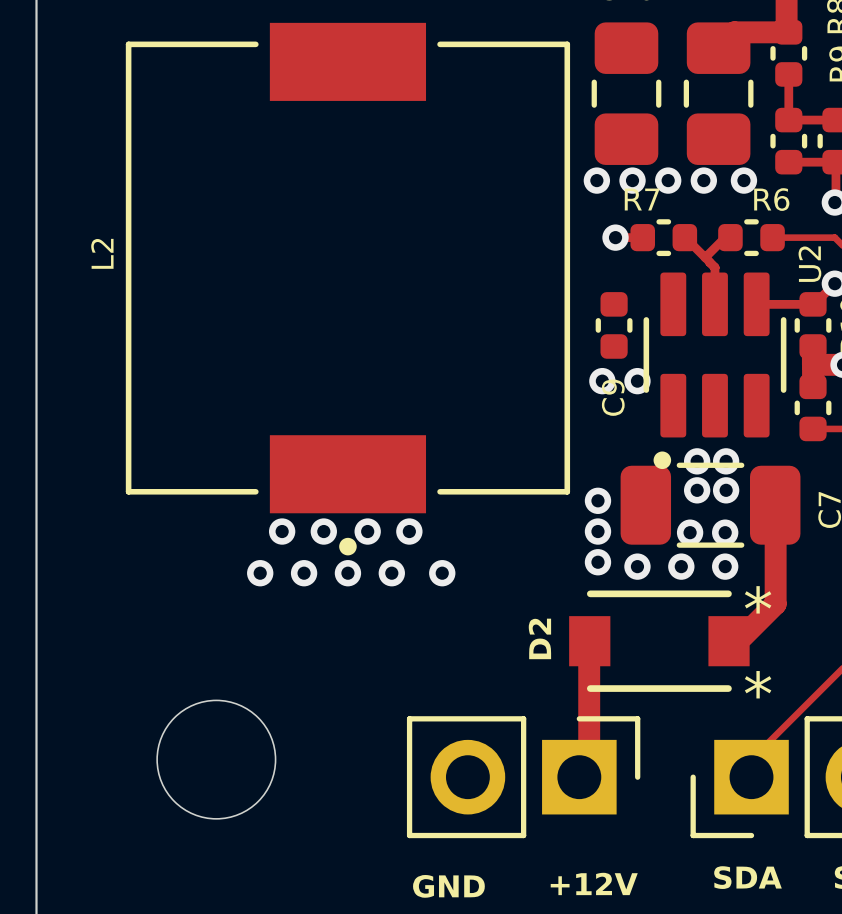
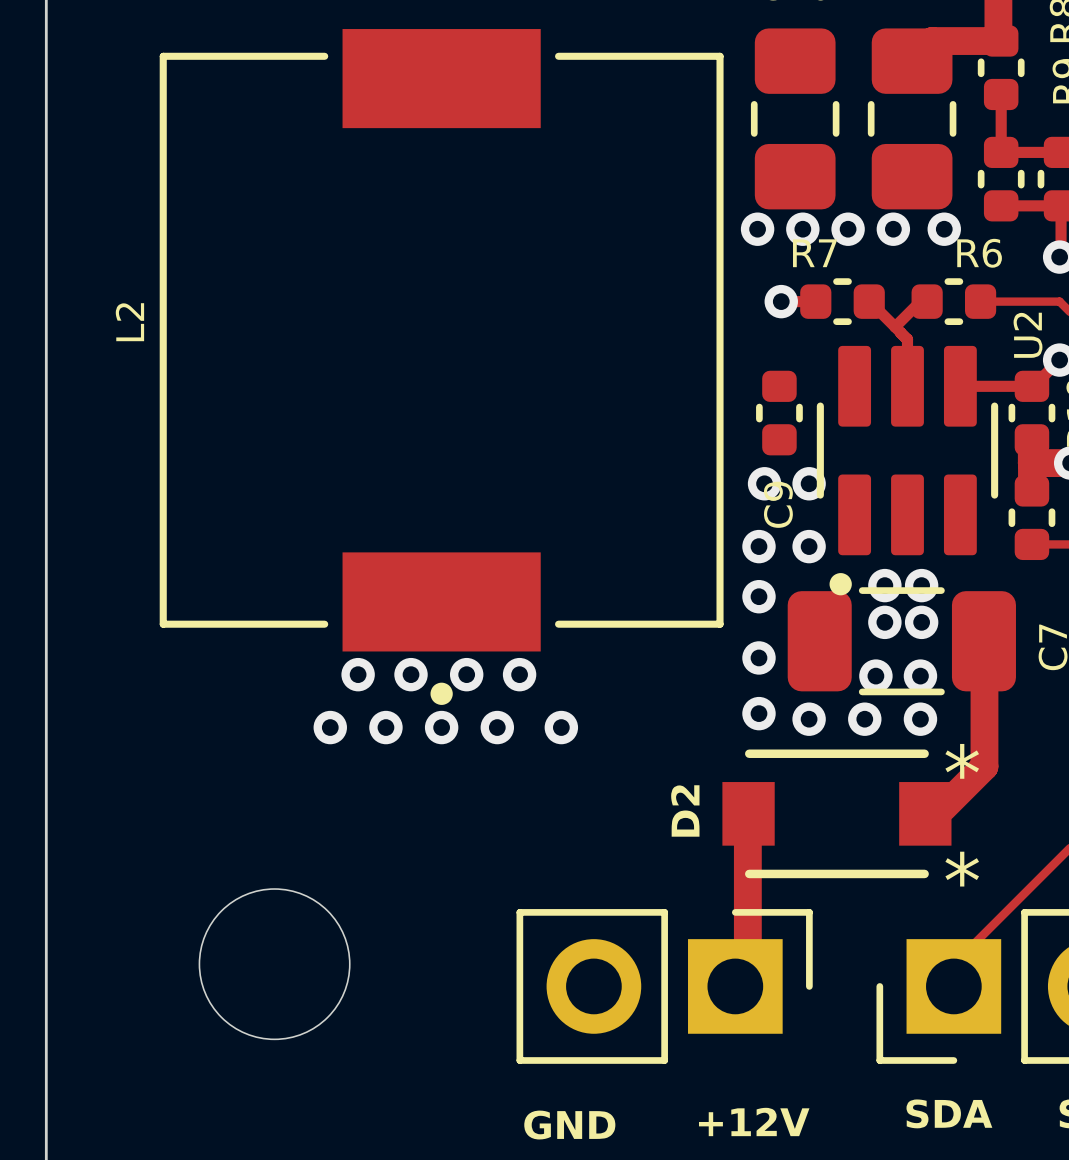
via: none -> (758, 546)
via: none -> (809, 546)
via: none -> (758, 596)
via: (597, 500) -> none
via: none -> (758, 657)
via: (597, 531) -> none

